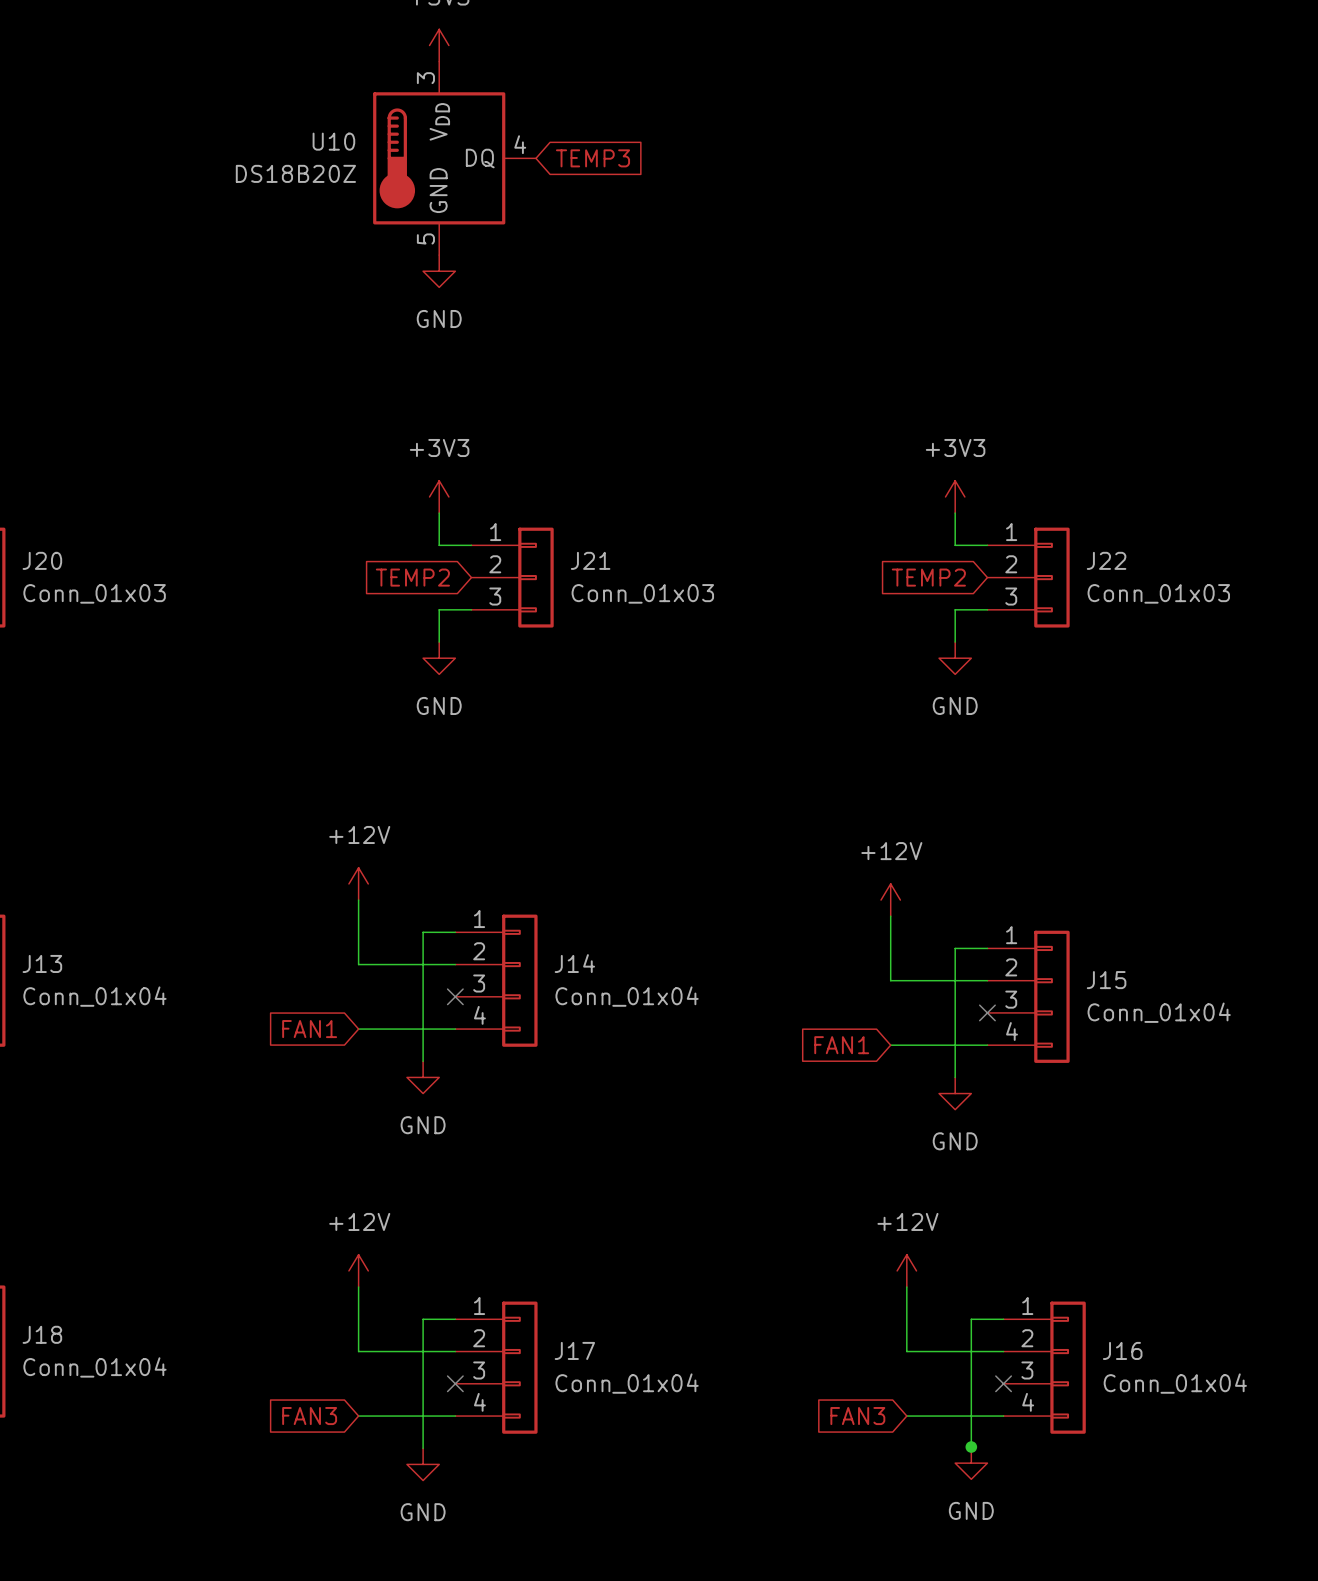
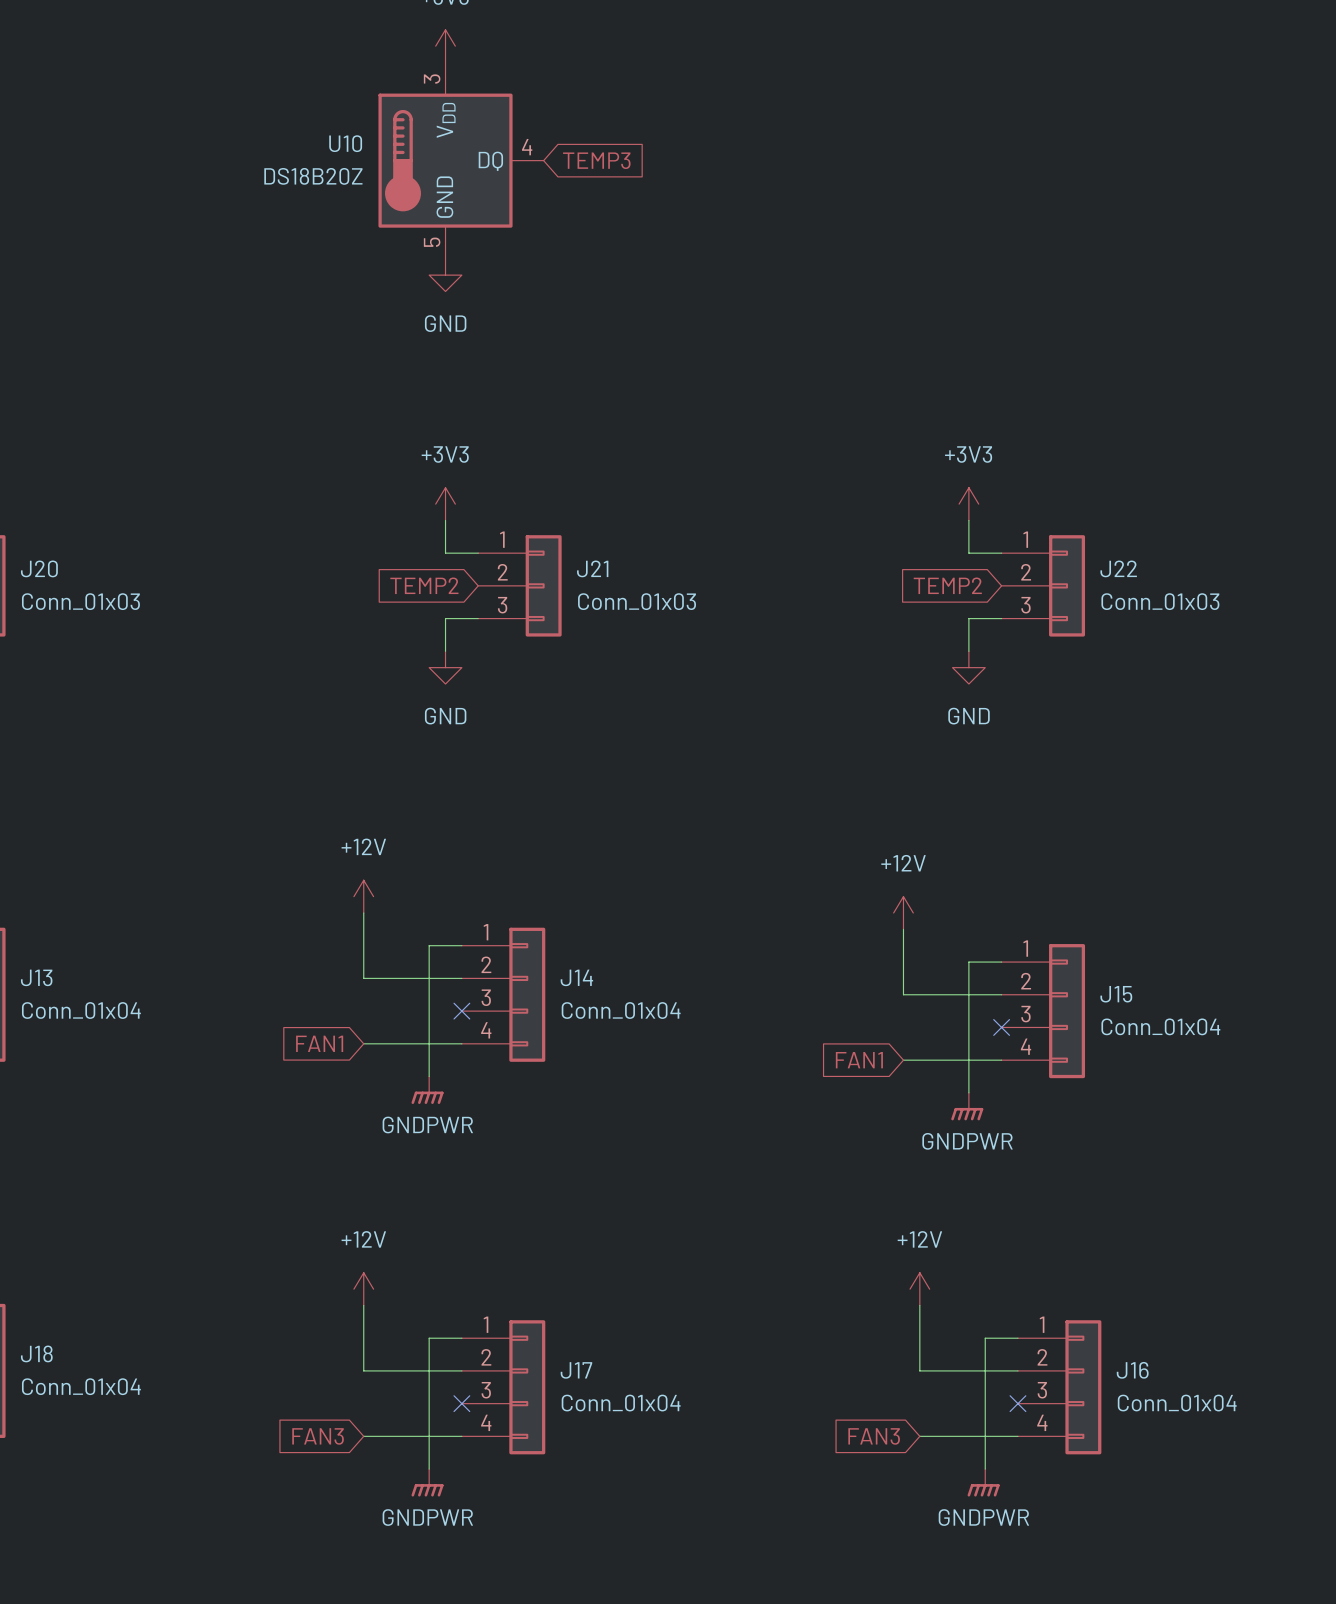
power symbol: GND (423, 1077) -> GNDPWR (427, 1090)
power symbol: GND (955, 1093) -> GNDPWR (967, 1106)
junction: (971, 1447) -> none
power symbol: GND (971, 1463) -> GNDPWR (983, 1482)
power symbol: GND (423, 1464) -> GNDPWR (427, 1482)

